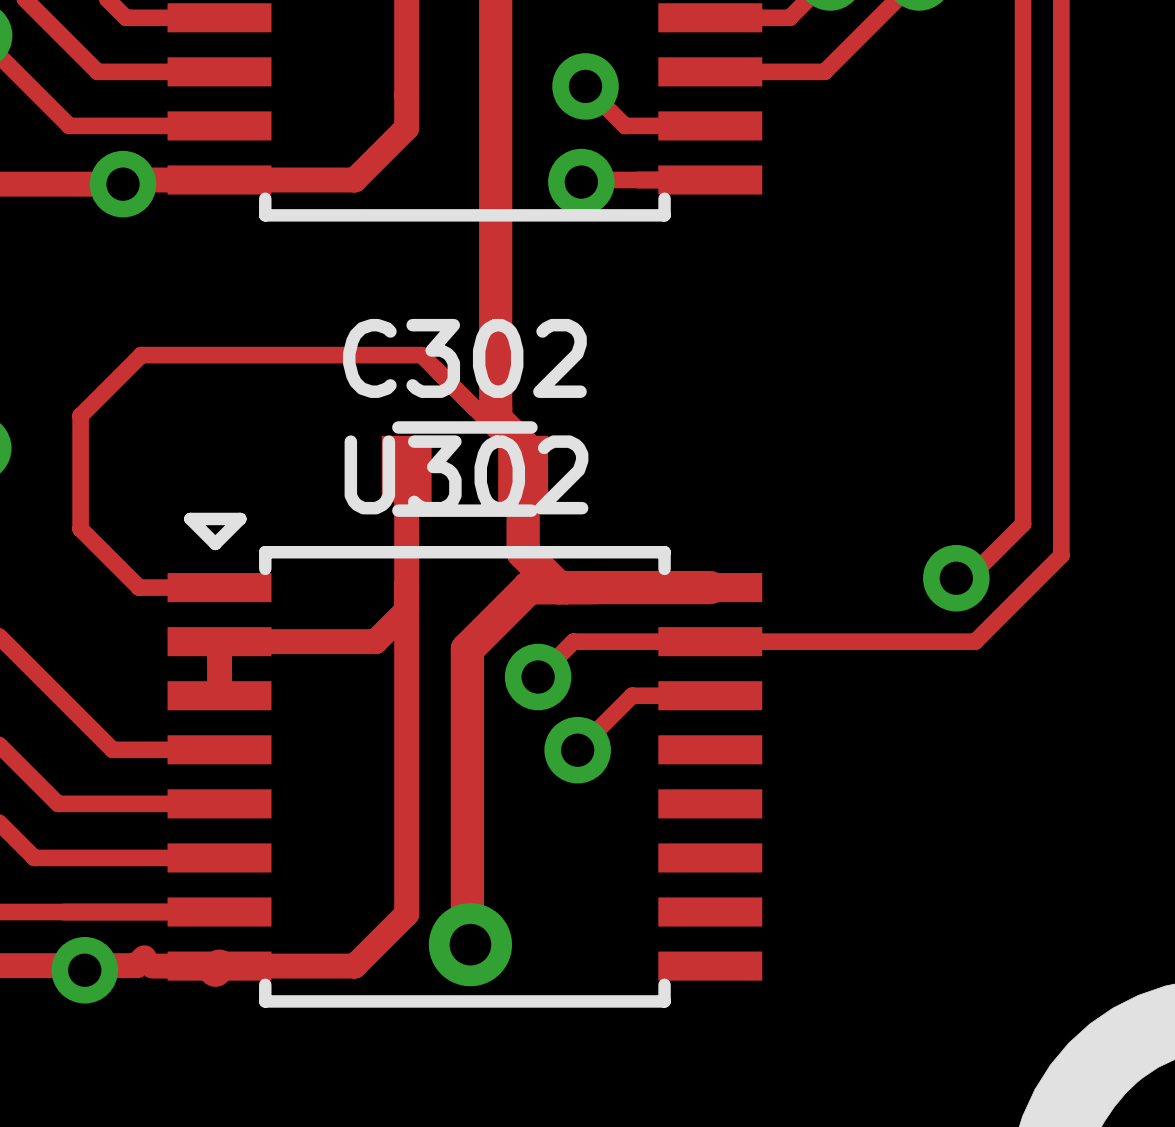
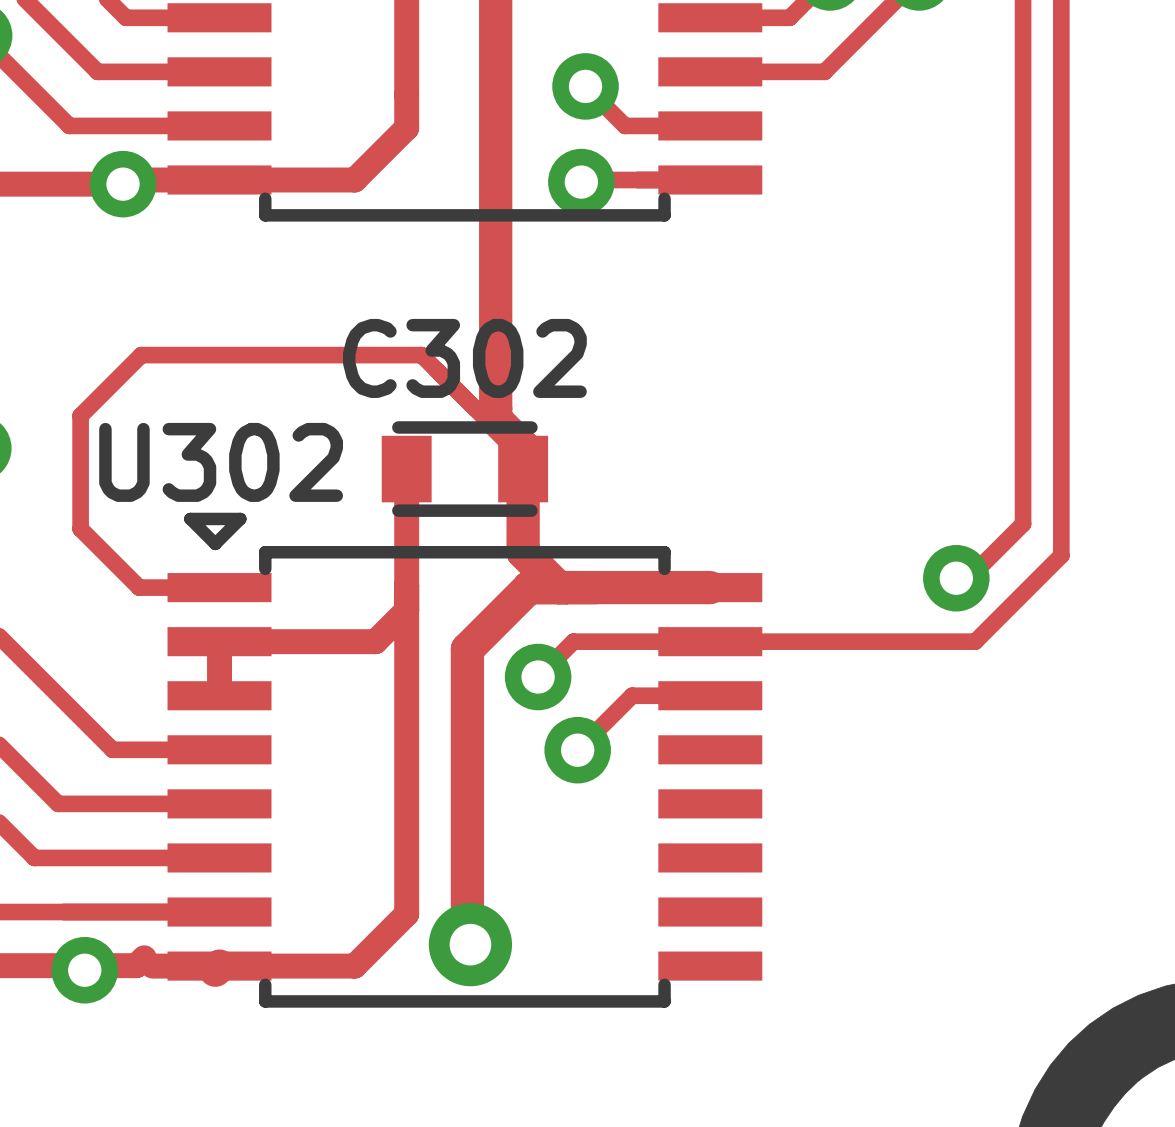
U302 name position: U302 (466, 474) -> U302 (221, 462)

